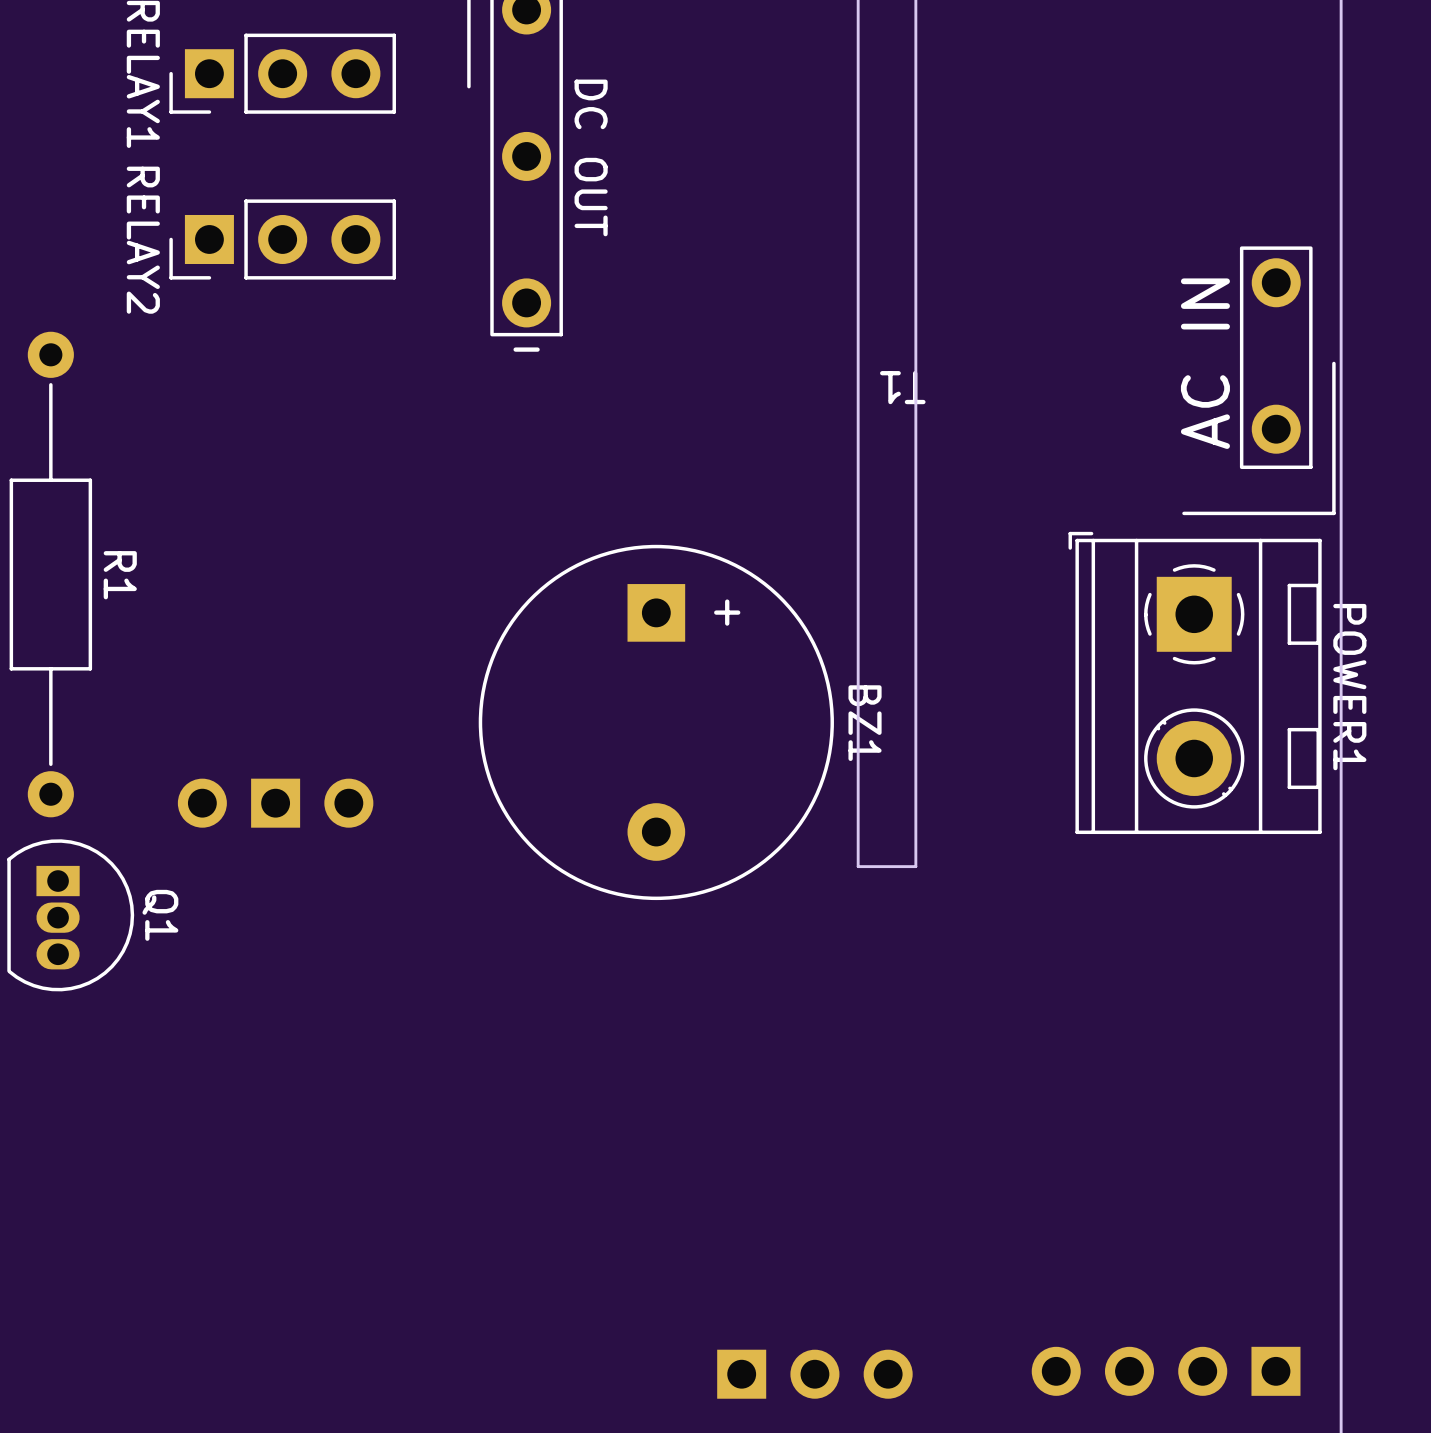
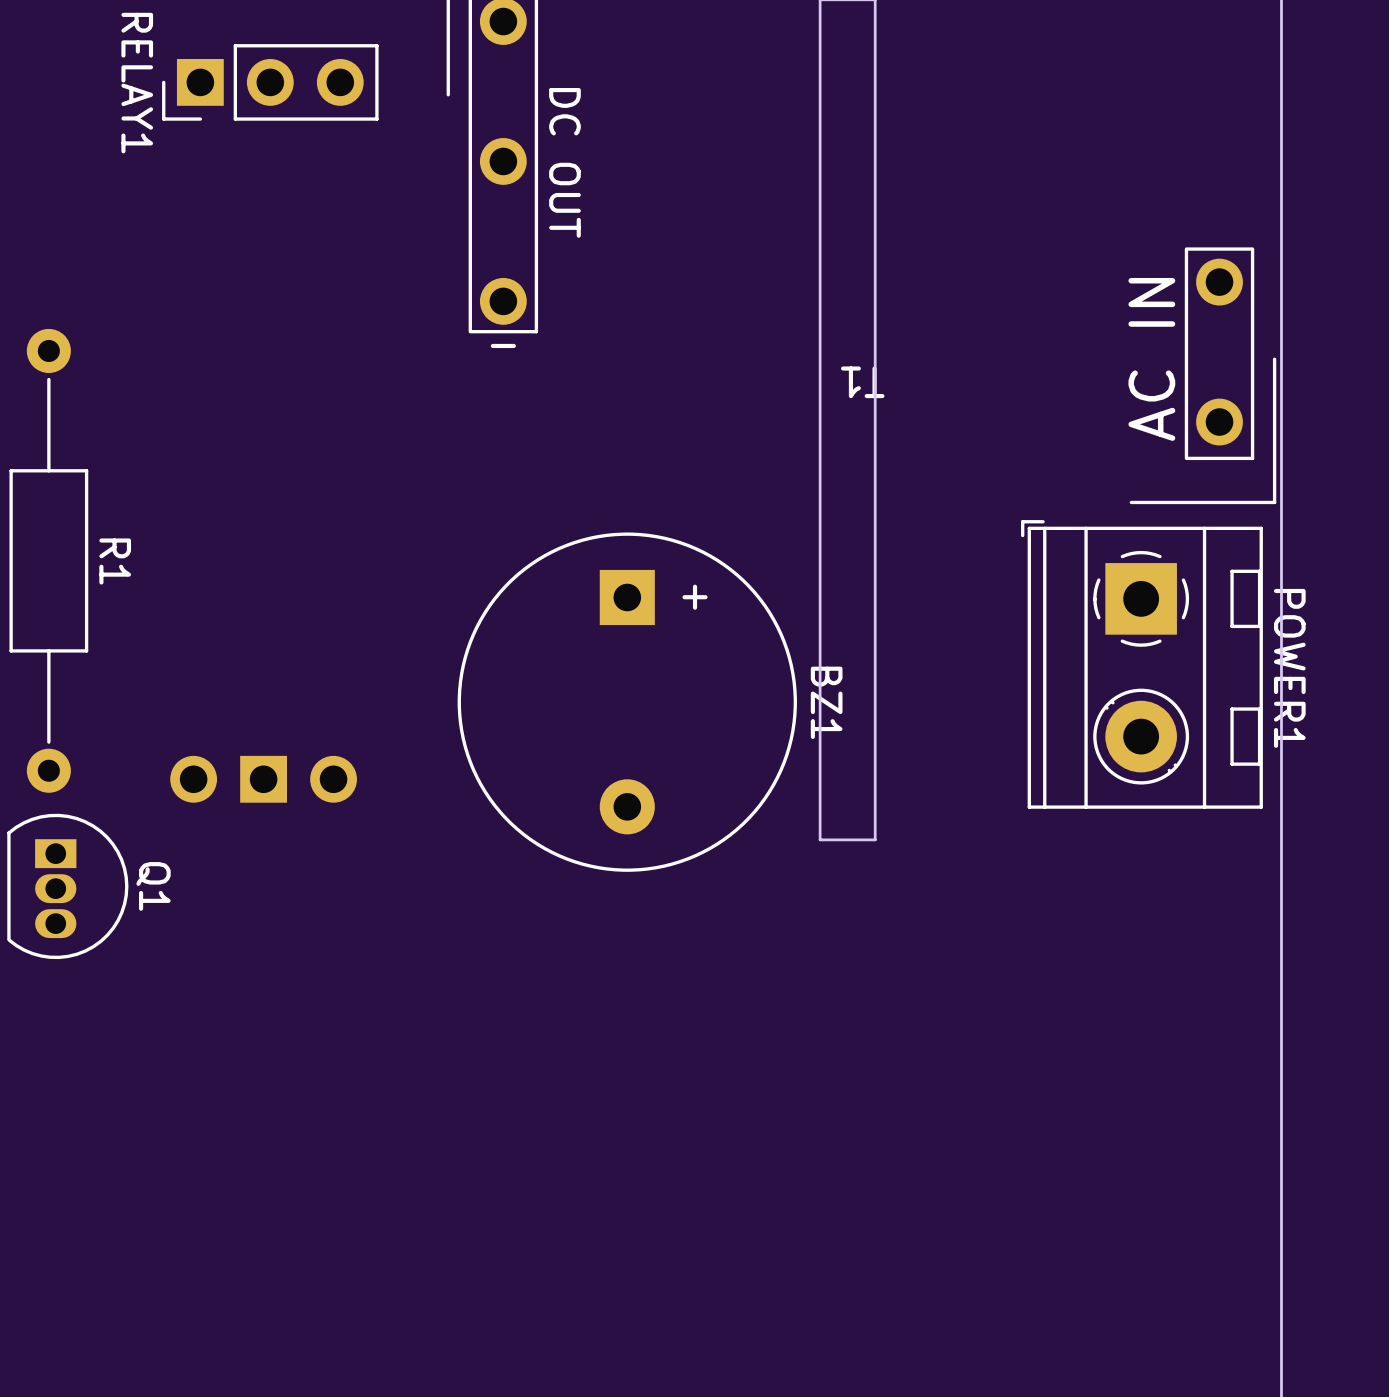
RELAY2: (282, 239) -> none
part: (1166, 1371) -> none
part: (814, 1374) -> none

